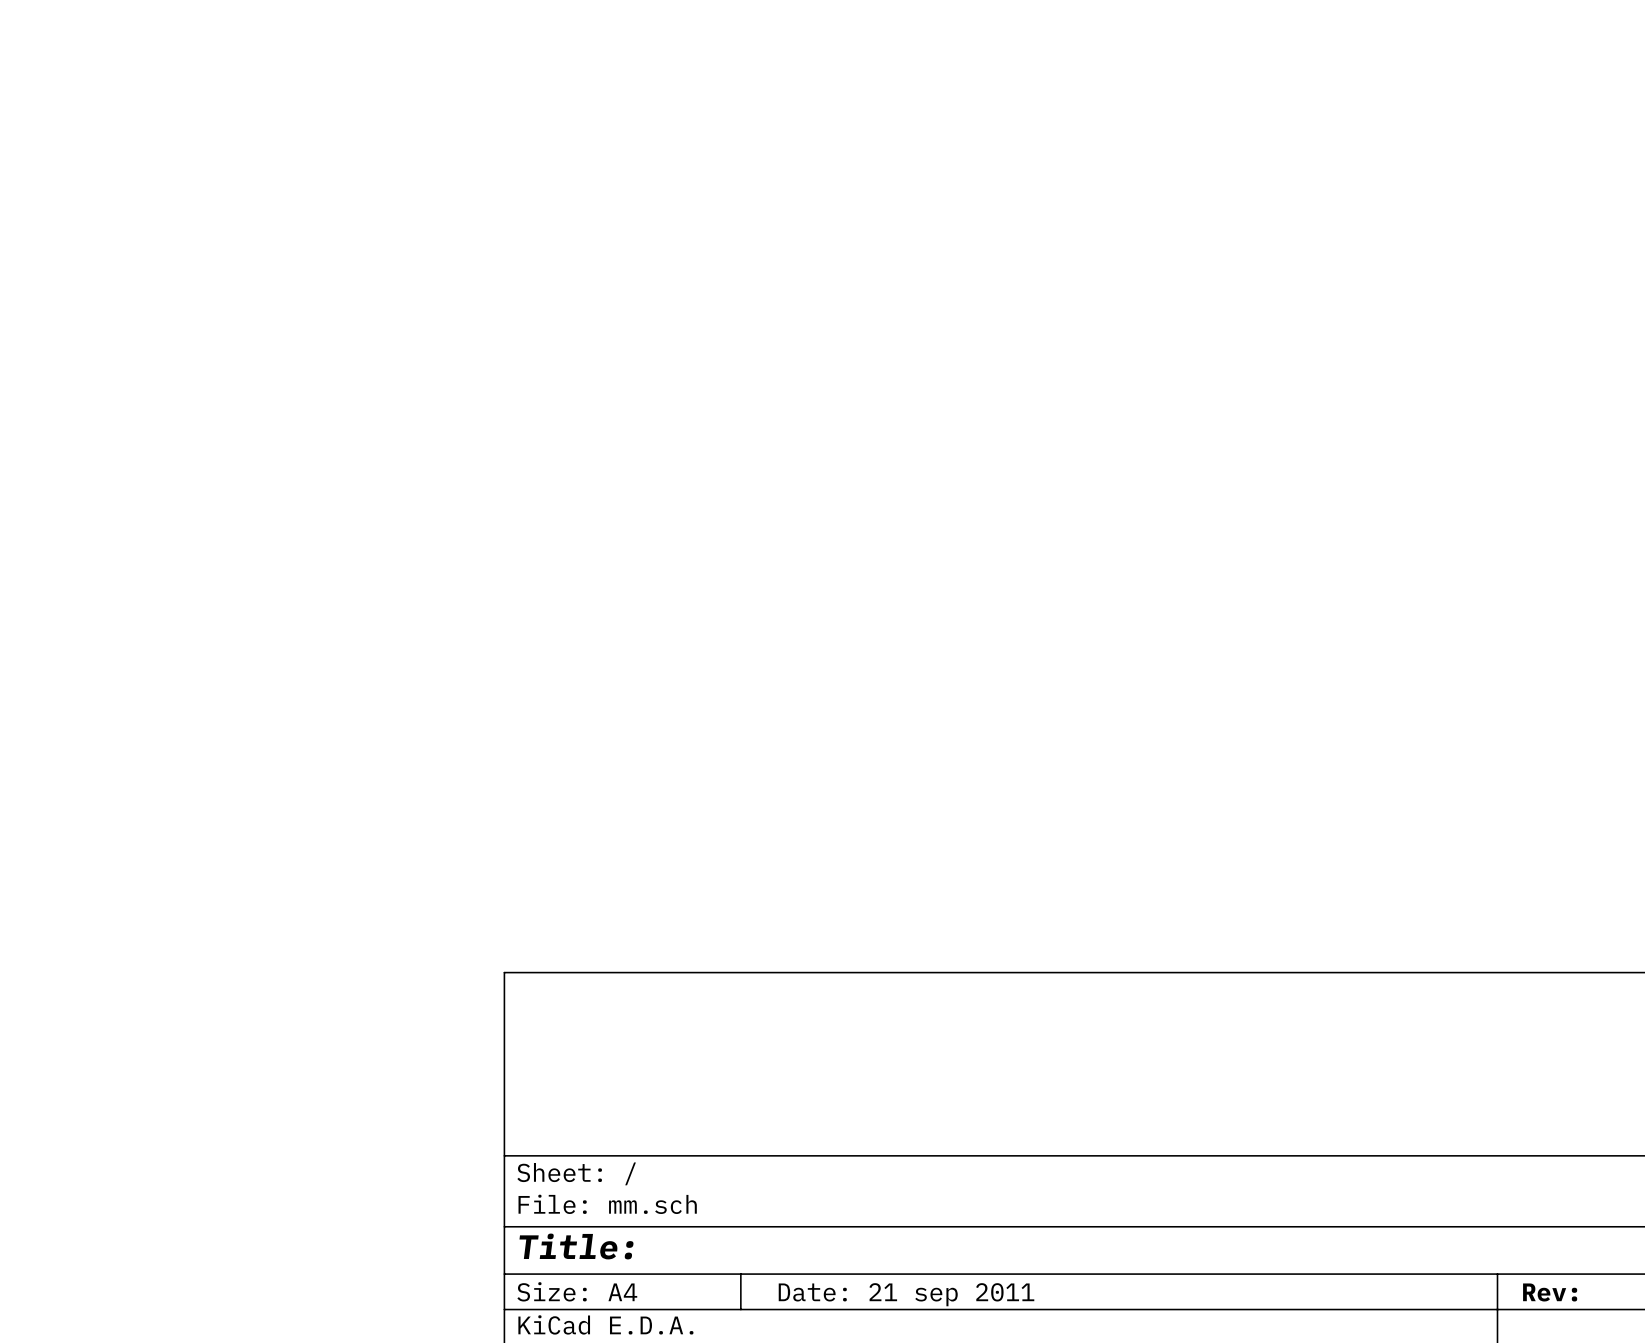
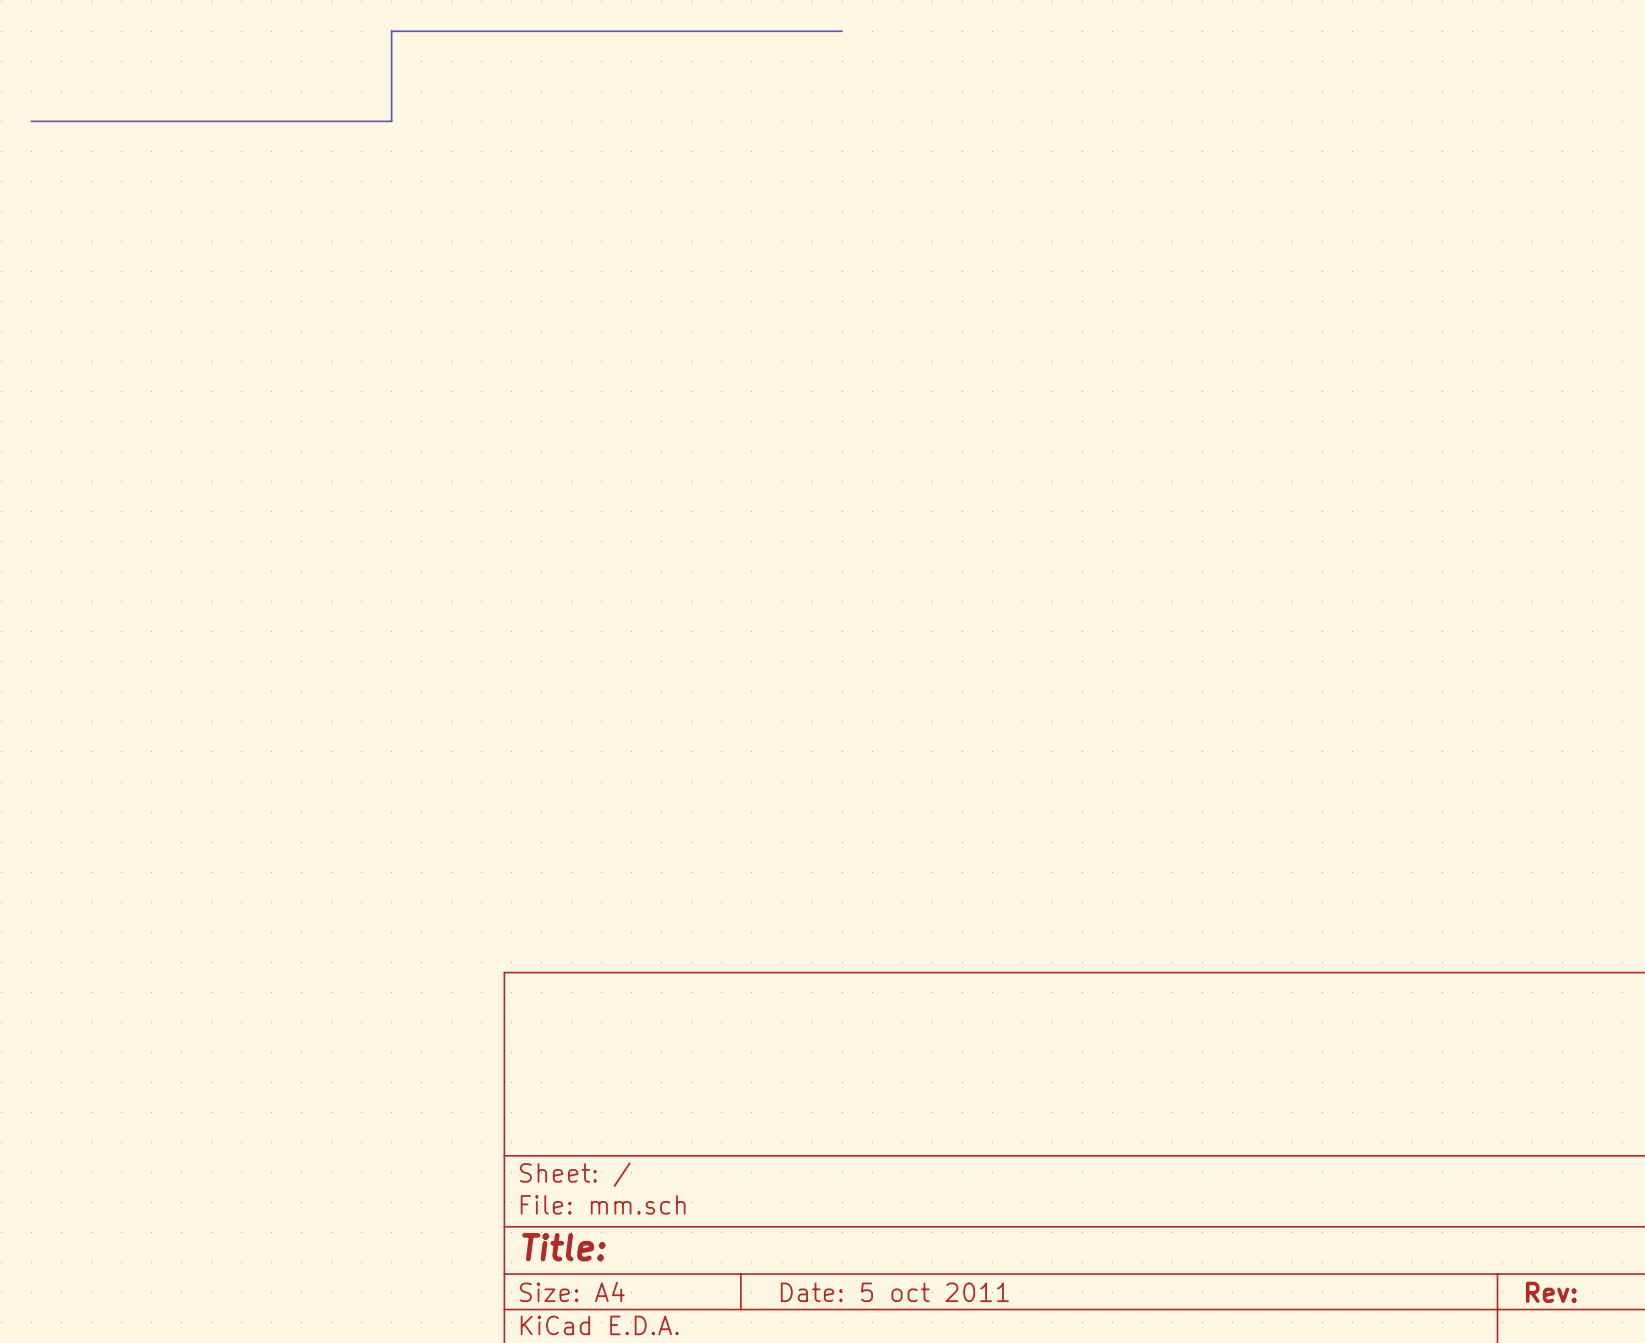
bus: none -> (842, 31) (391, 31) (391, 121) (31, 121)
title block: Date: 21 sep 2011 (906, 1294) -> Date: 5 oct 2011 (894, 1292)

